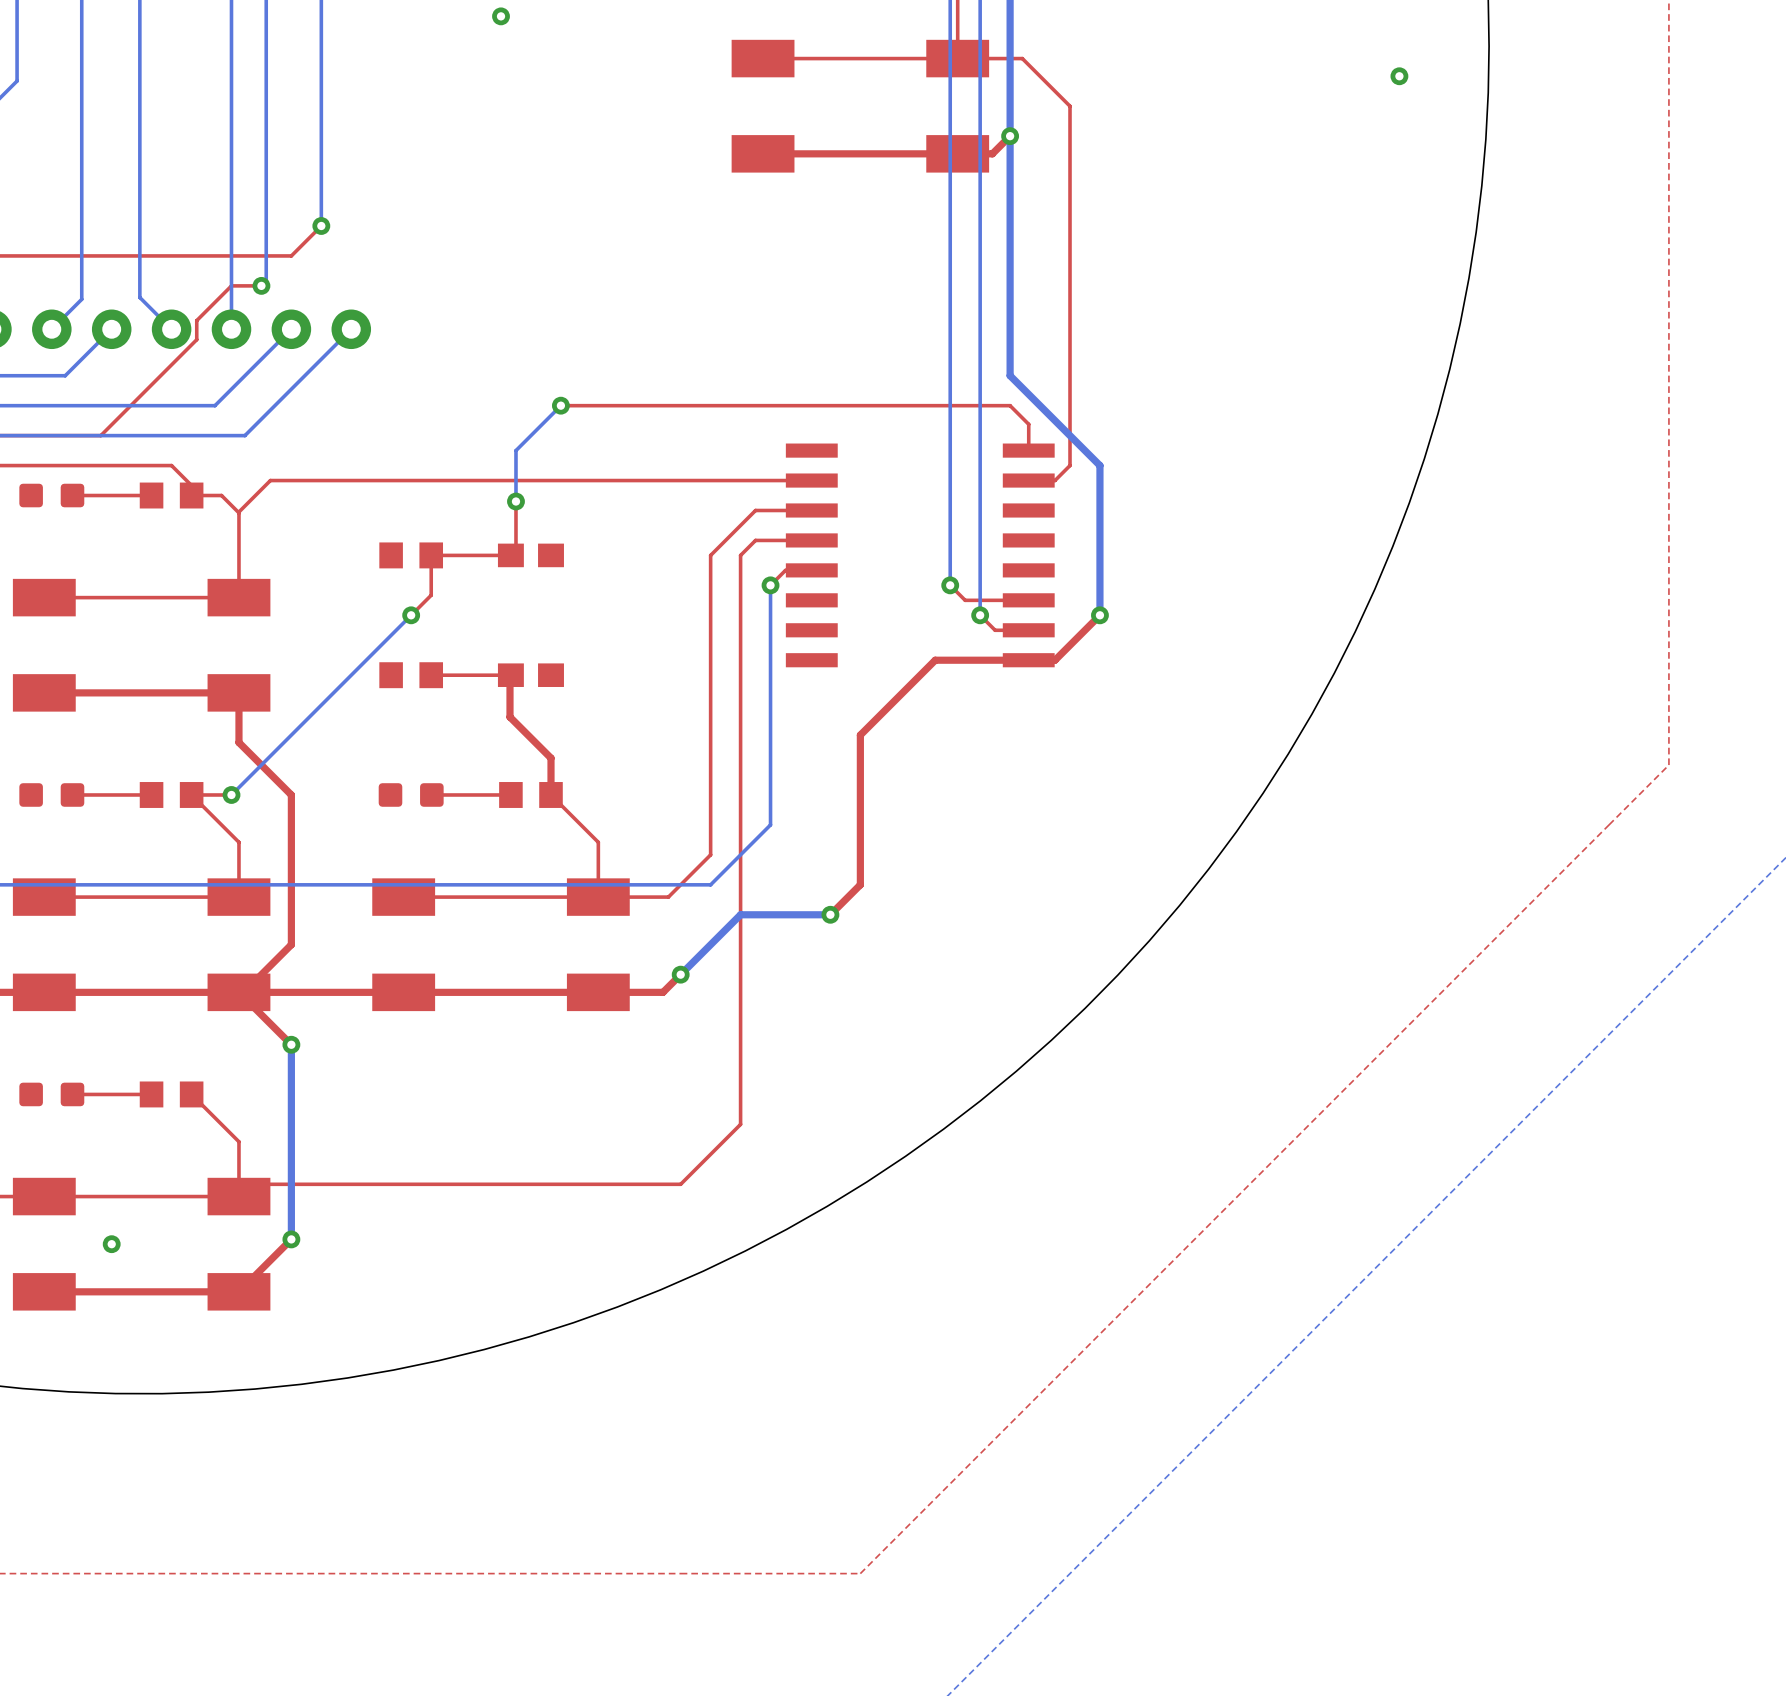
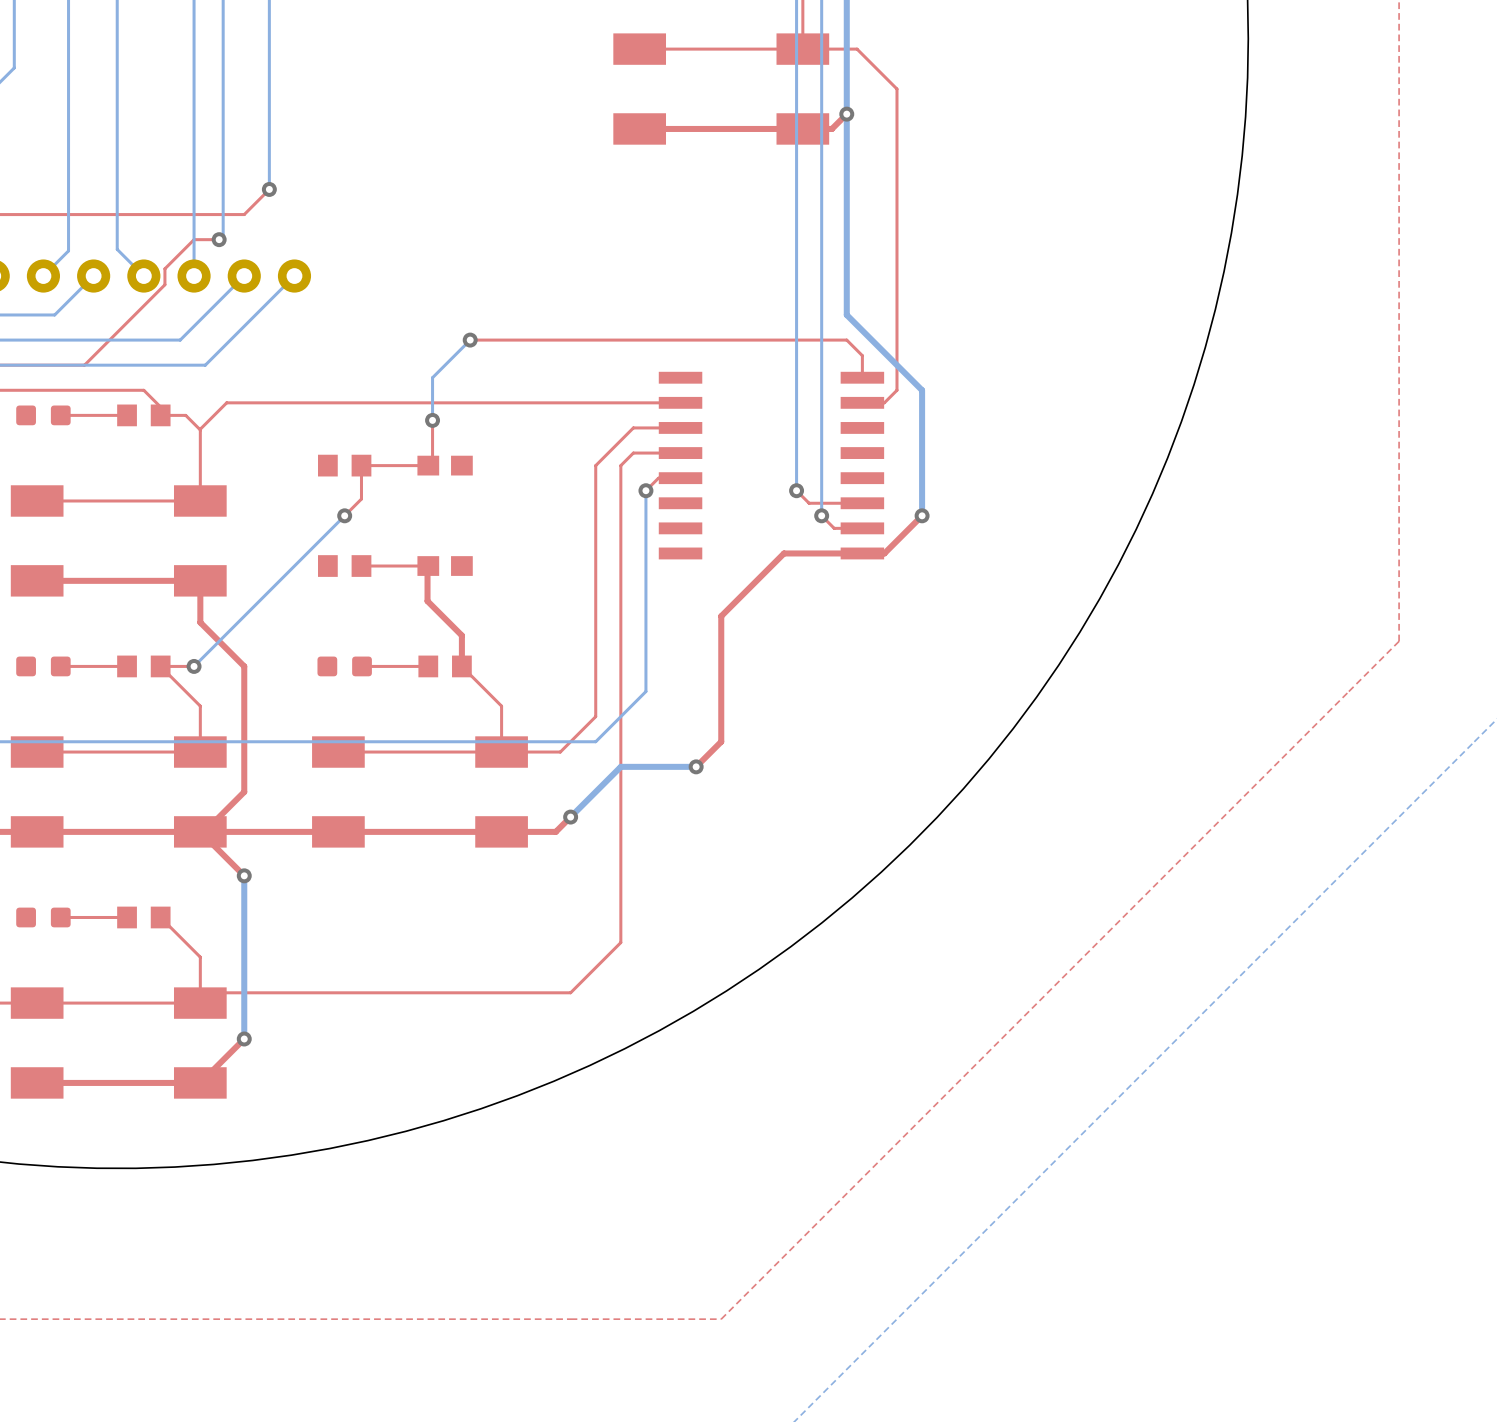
via: (501, 16) -> none
via: (1399, 76) -> none
via: (111, 1244) -> none

